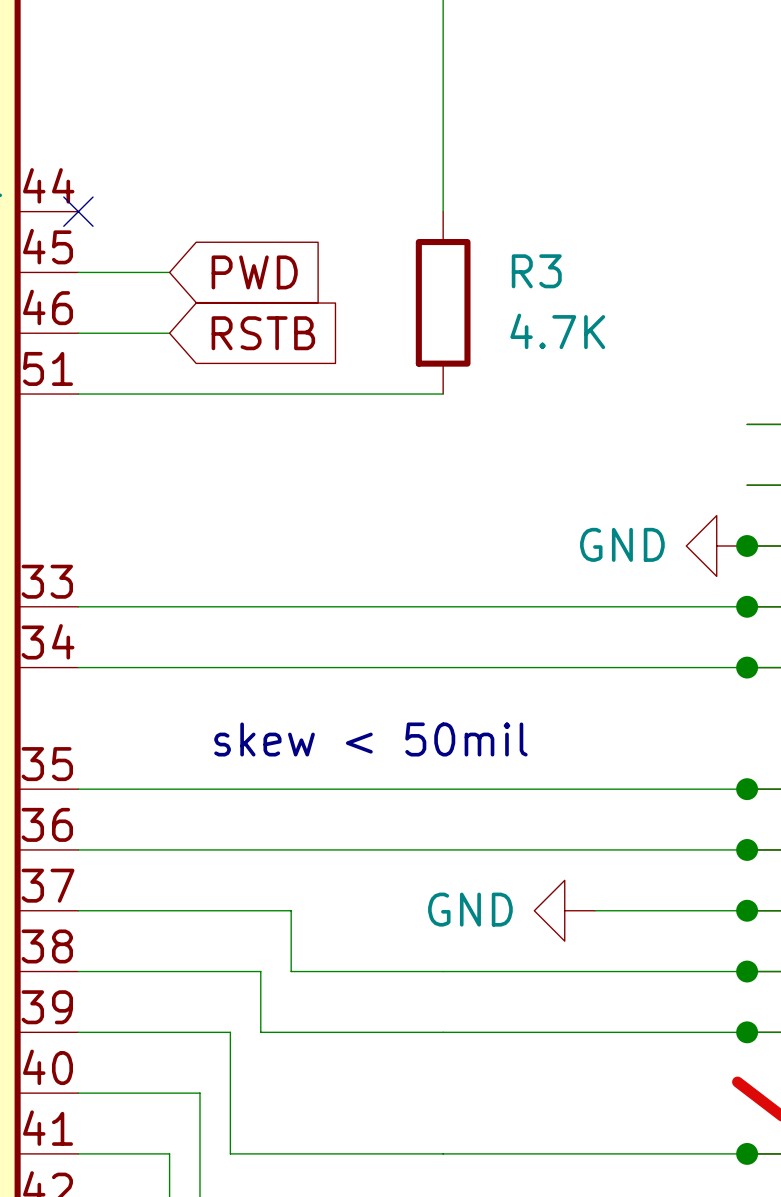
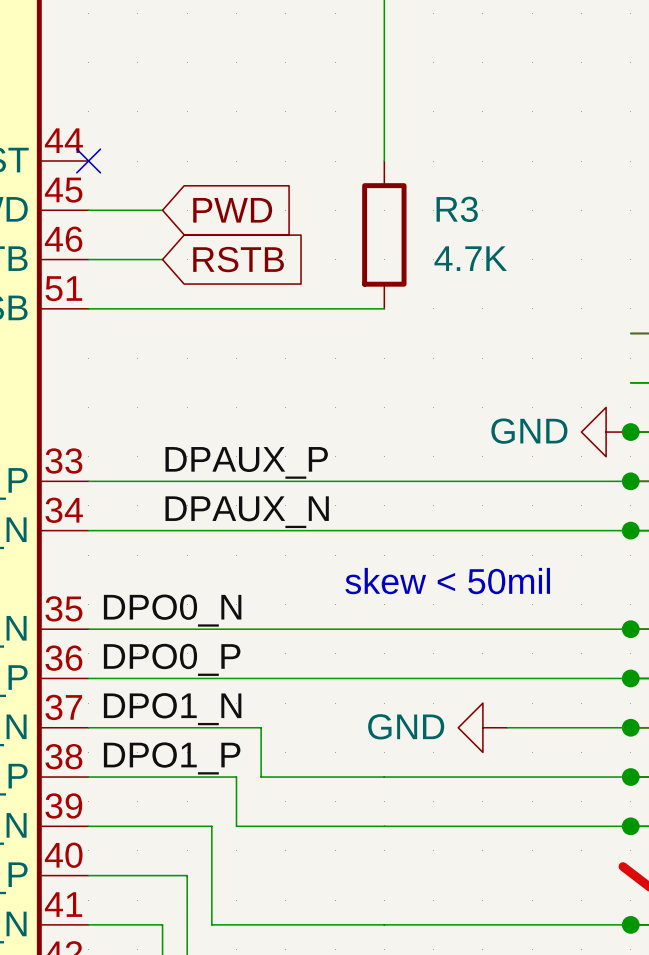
label: none -> DPAUX_P (246, 462)
label: none -> DPAUX_N (247, 512)
text position: skew < 50mil (370, 739) -> skew < 50mil (447, 581)
label: none -> DPO0_N (172, 610)
label: none -> DPO0_P (172, 659)
label: none -> DPO1_N (172, 709)
label: none -> DPO1_P (172, 758)

